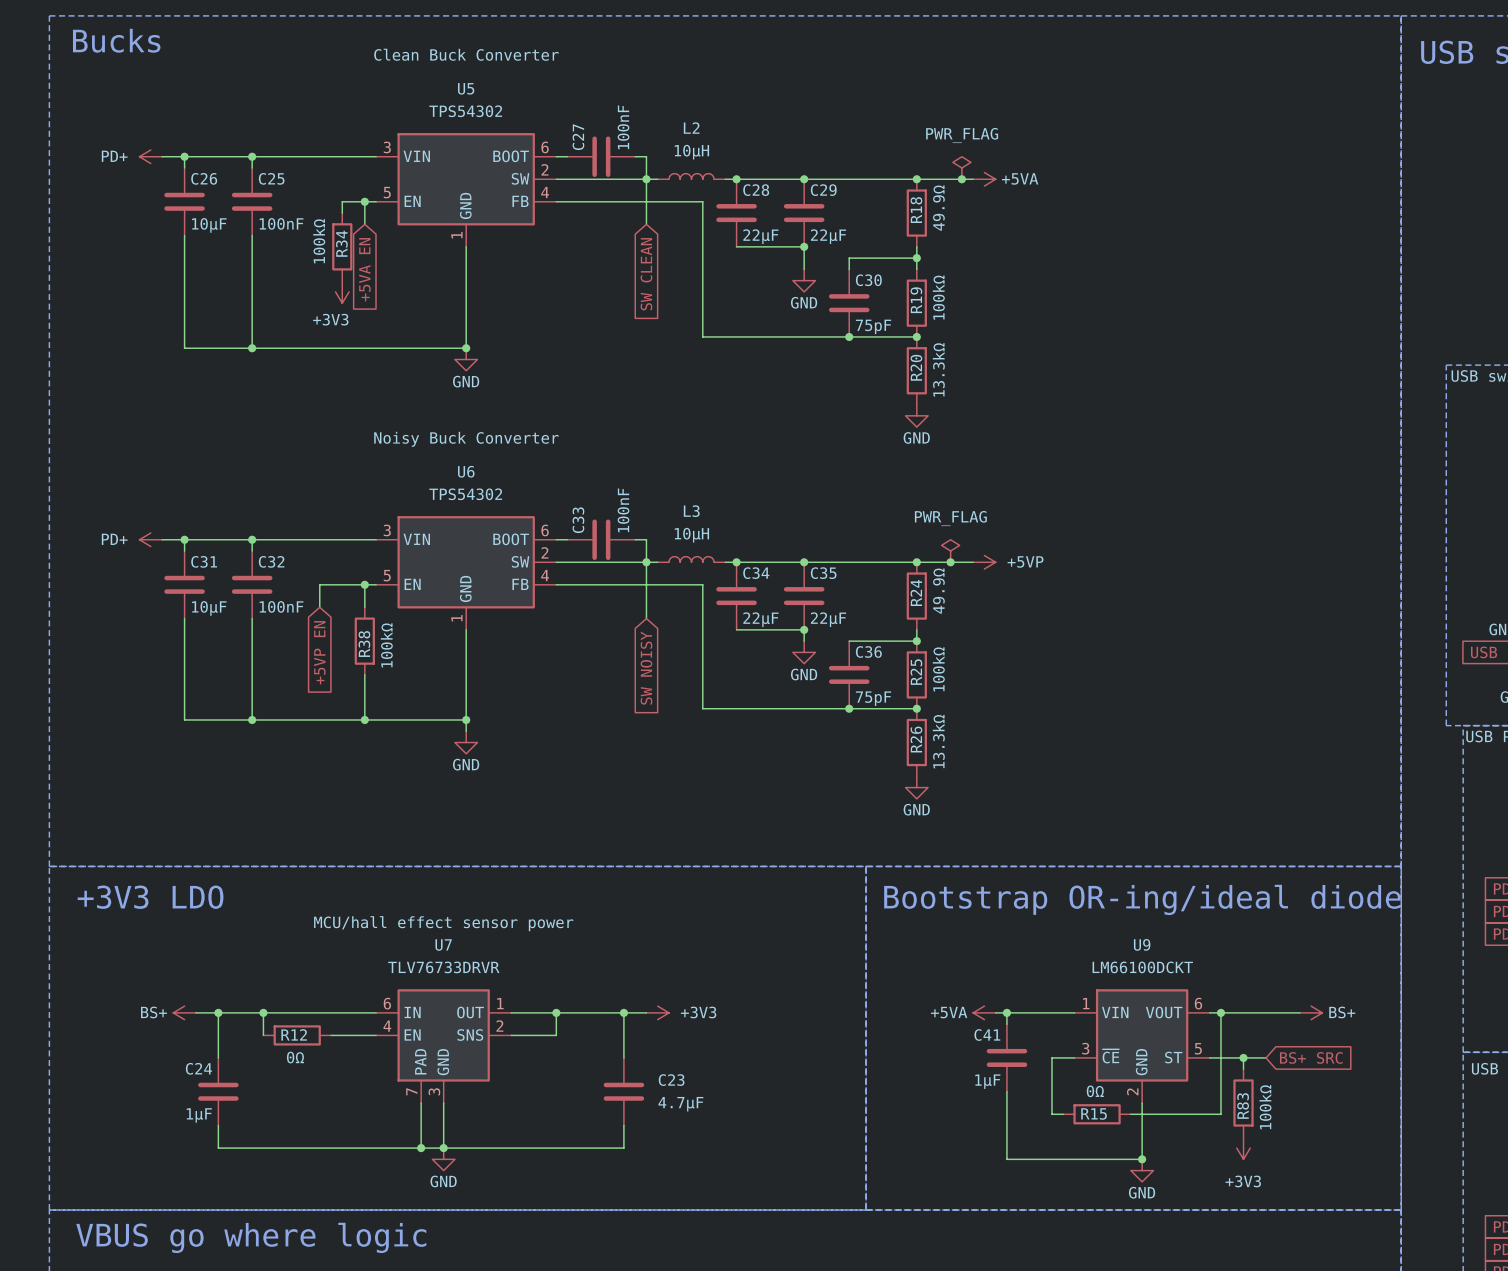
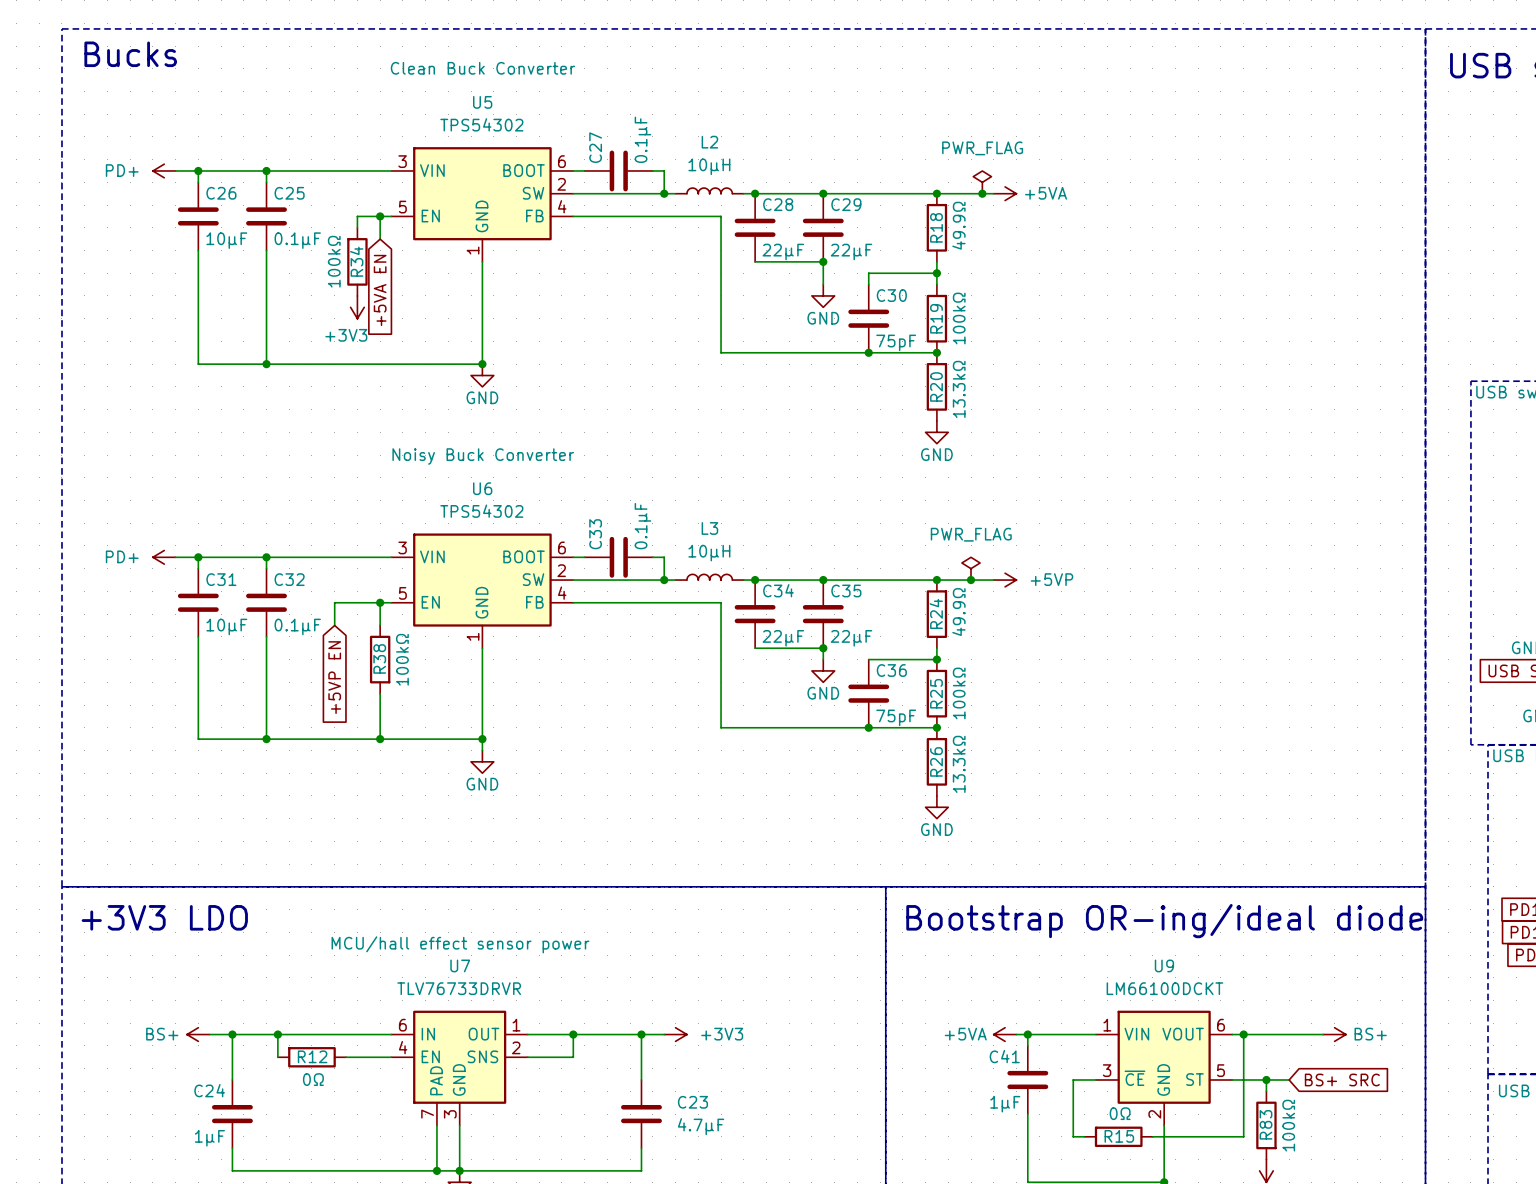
C27 value: 100nF (623, 127) -> 0.1µF (642, 139)
wire: (646, 179) (646, 224) -> none
C25 value: 100nF (281, 223) -> 0.1µF (297, 240)
global label: SW CLEAN (646, 274) -> none
C33 value: 100nF (623, 510) -> 0.1µF (642, 526)
wire: (646, 562) (646, 618) -> none
C32 value: 100nF (281, 606) -> 0.1µF (297, 626)
global label: SW NOISY (646, 668) -> none

